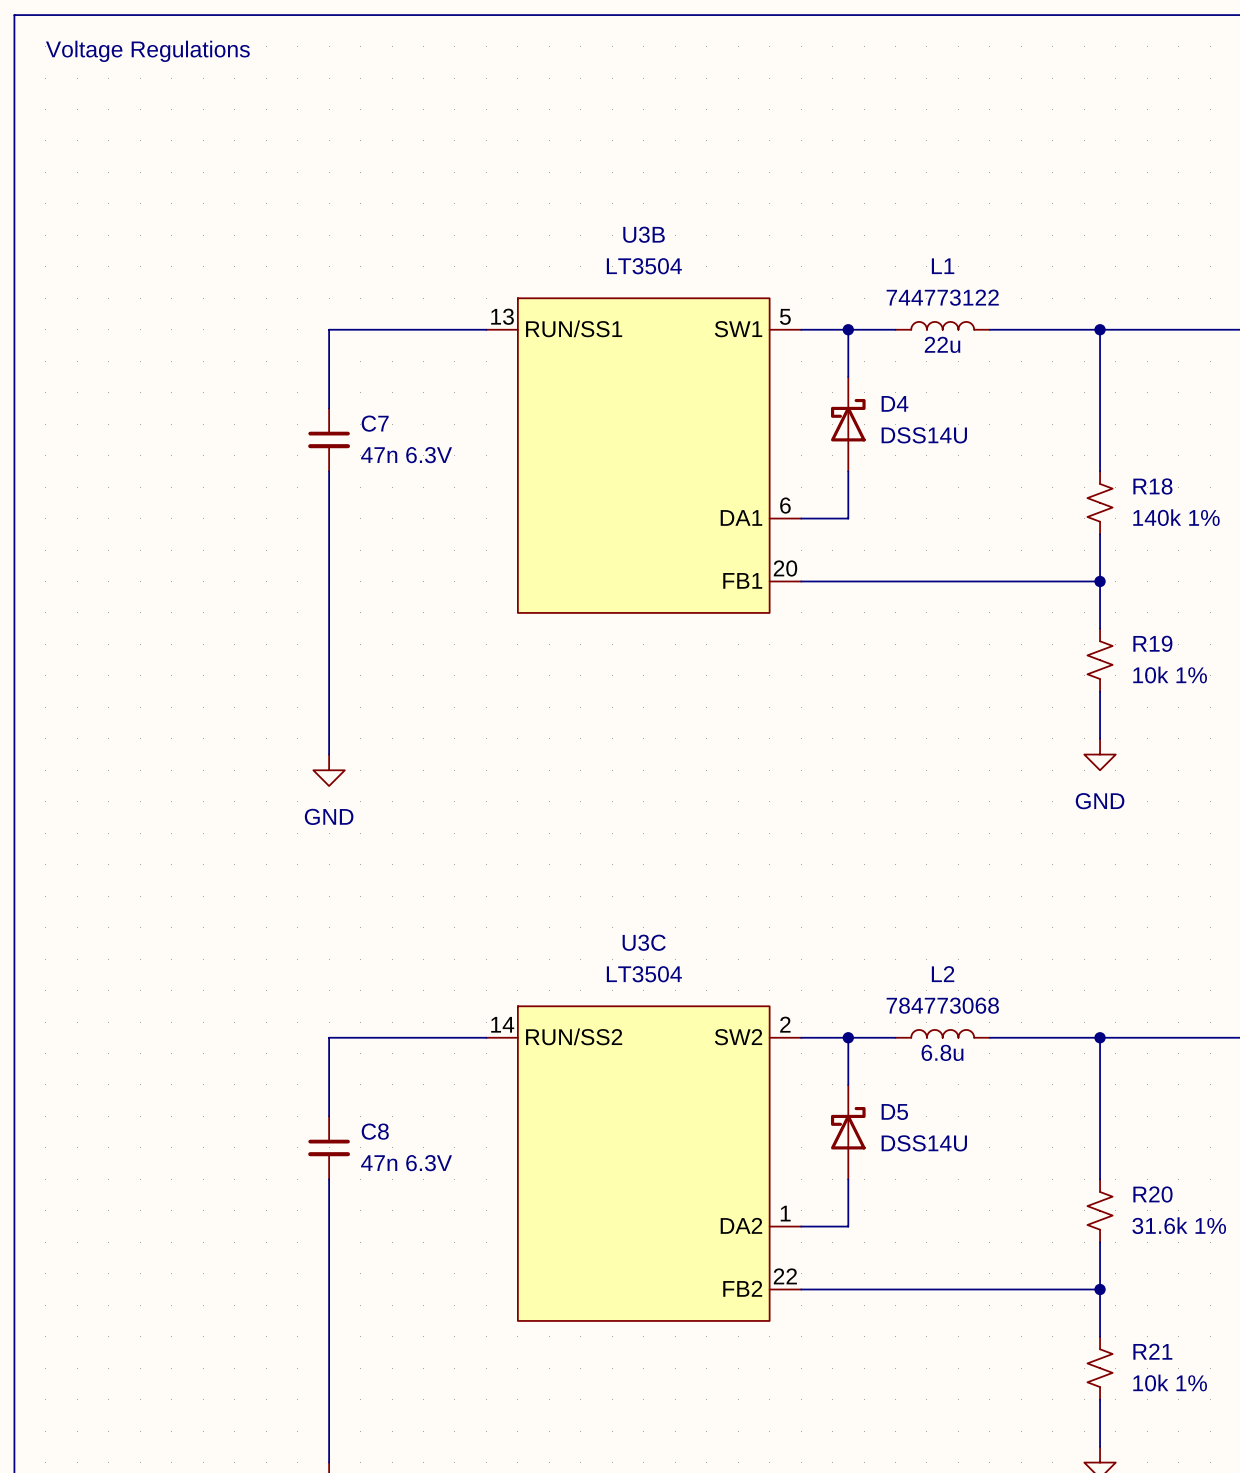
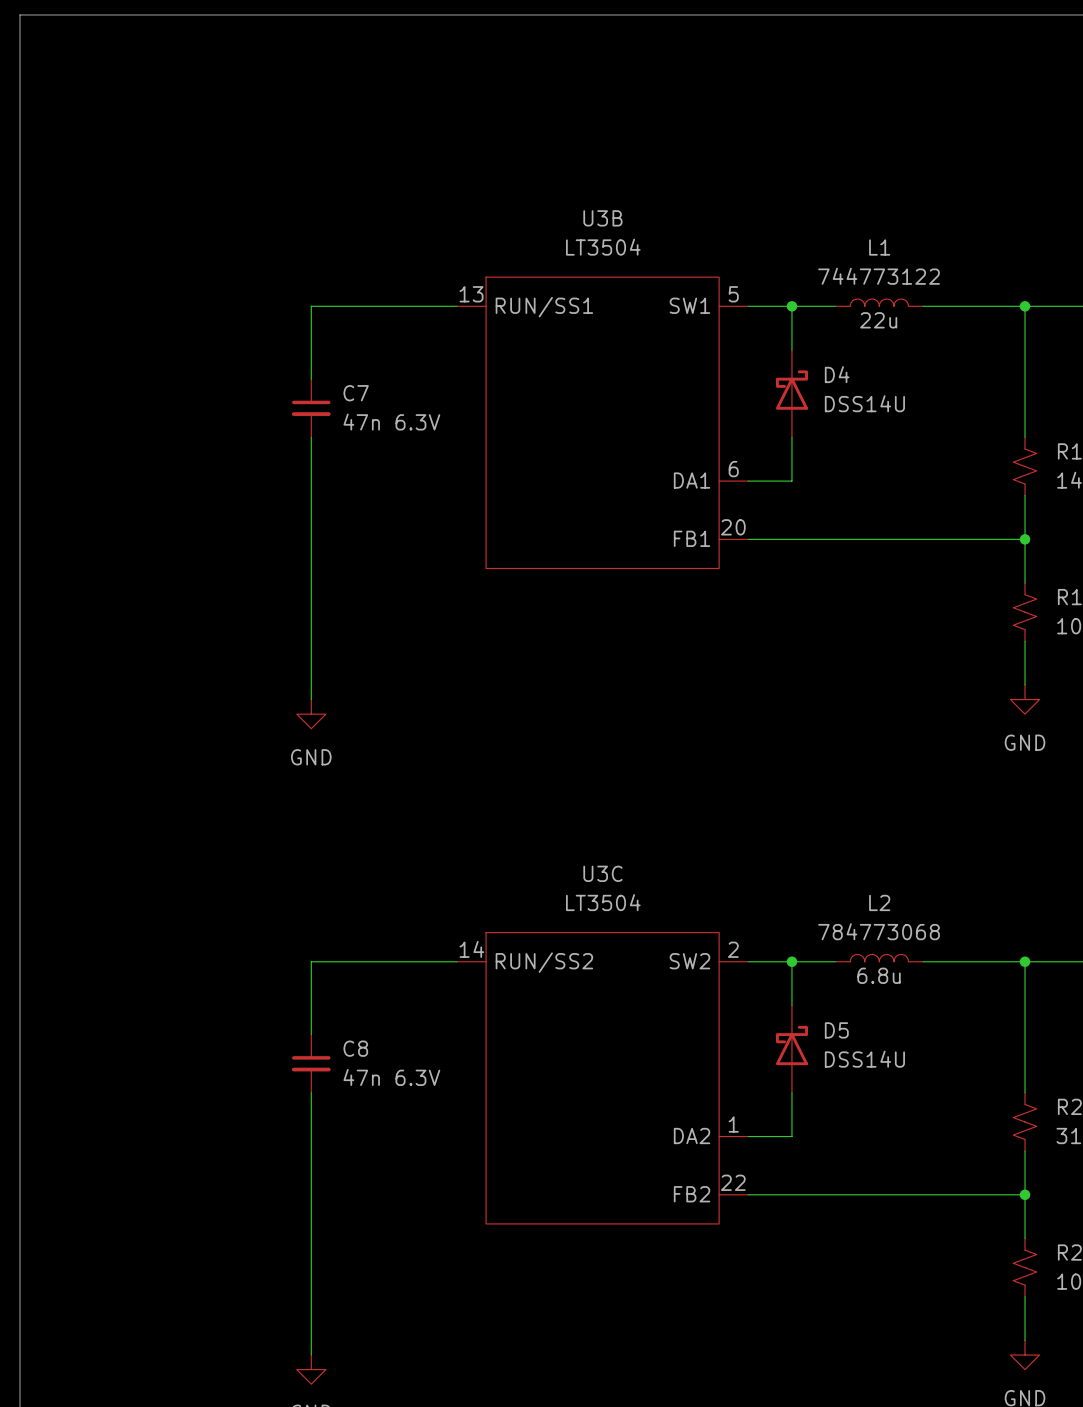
text: Voltage Regulations (147, 51) -> none

